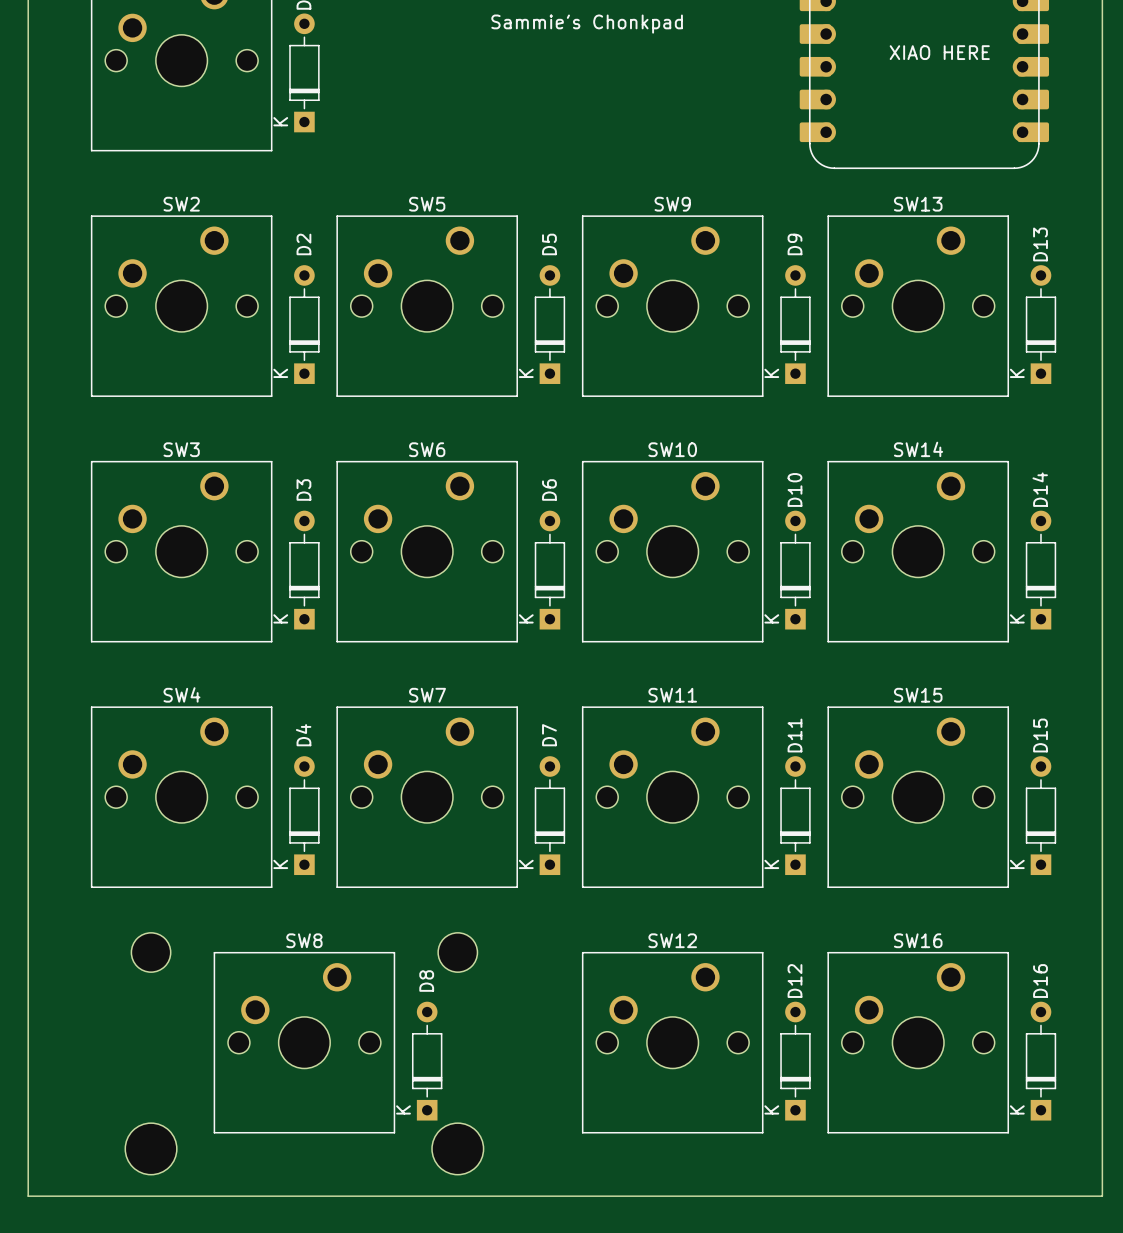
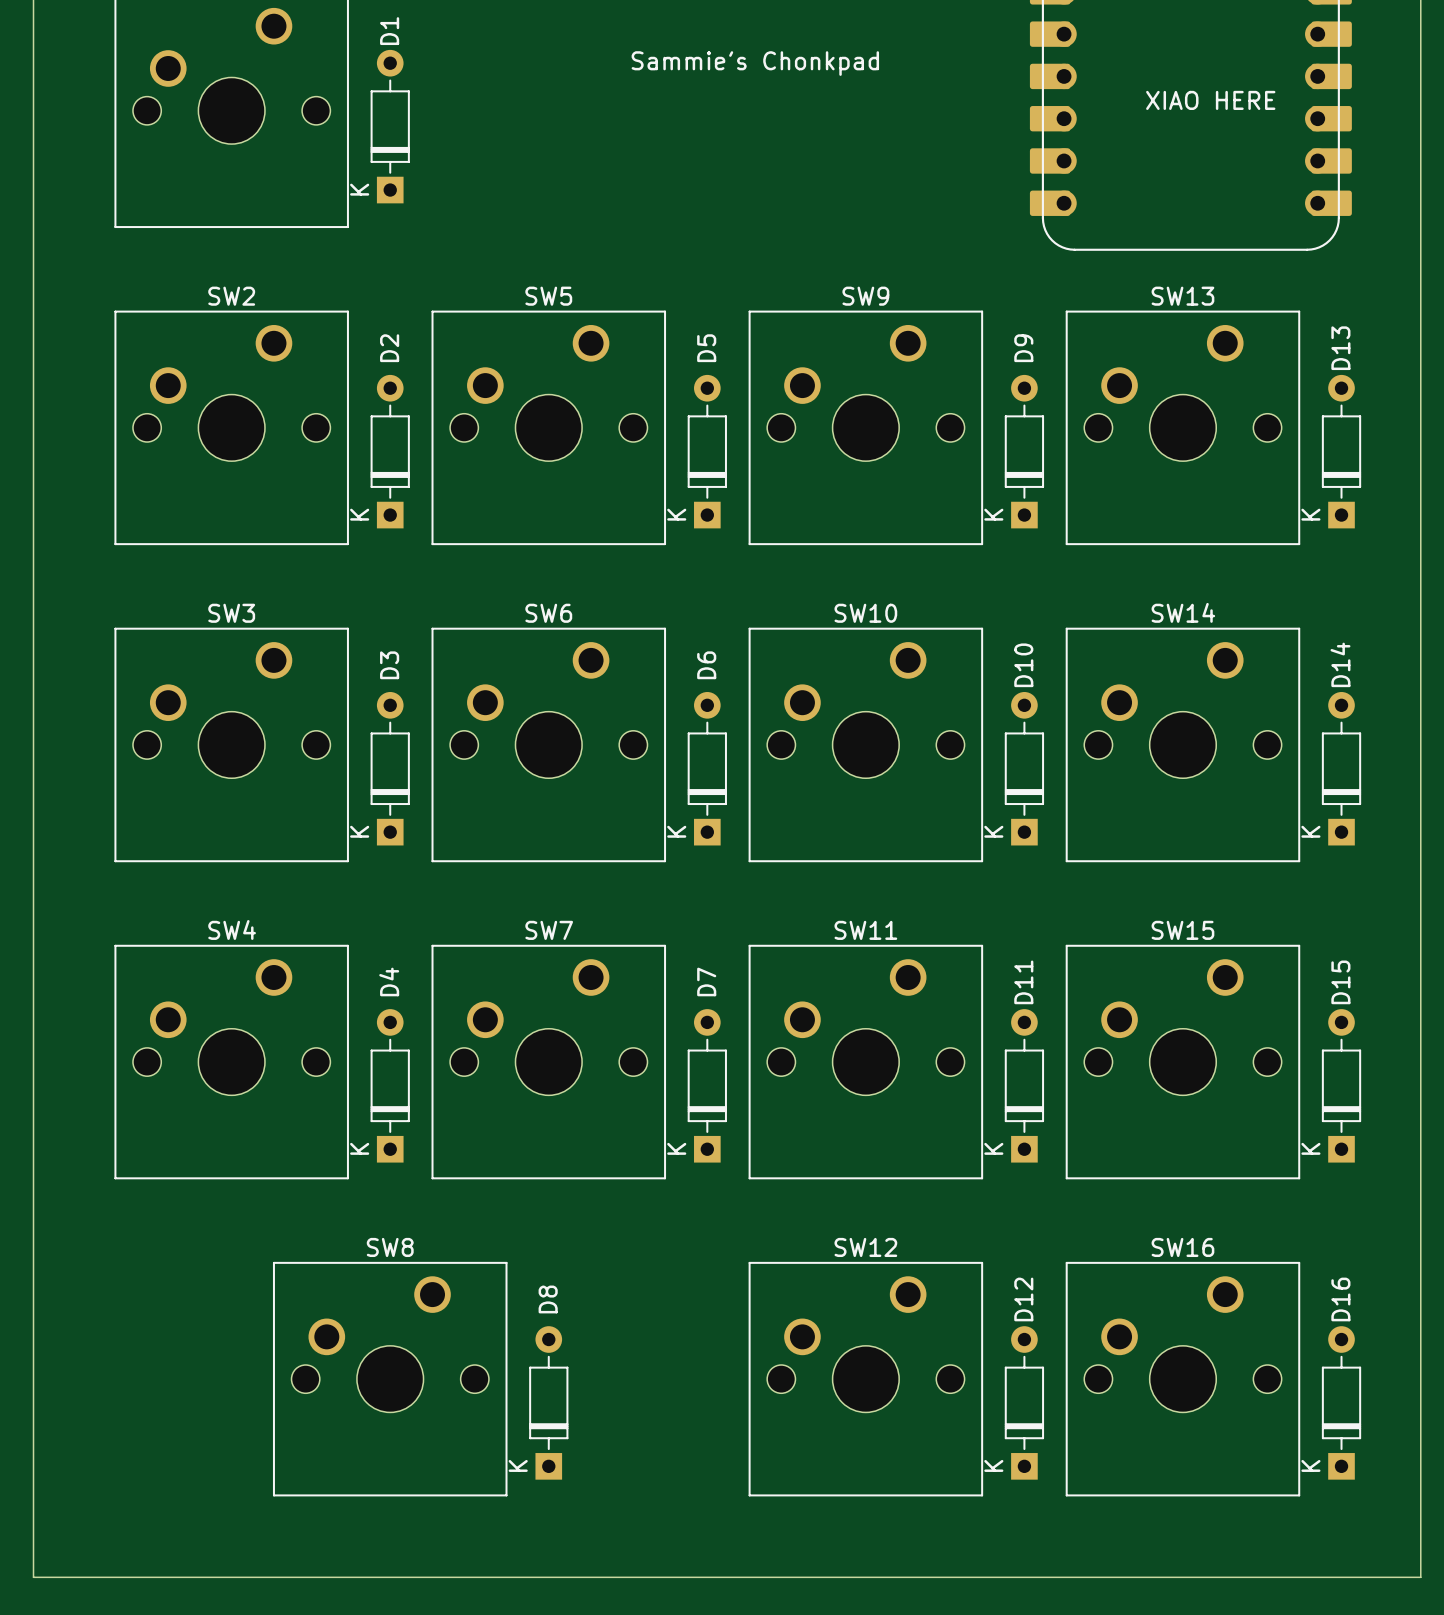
SW8 footprint: [125, 932, 484, 1175] -> [272, 1261, 508, 1497]

